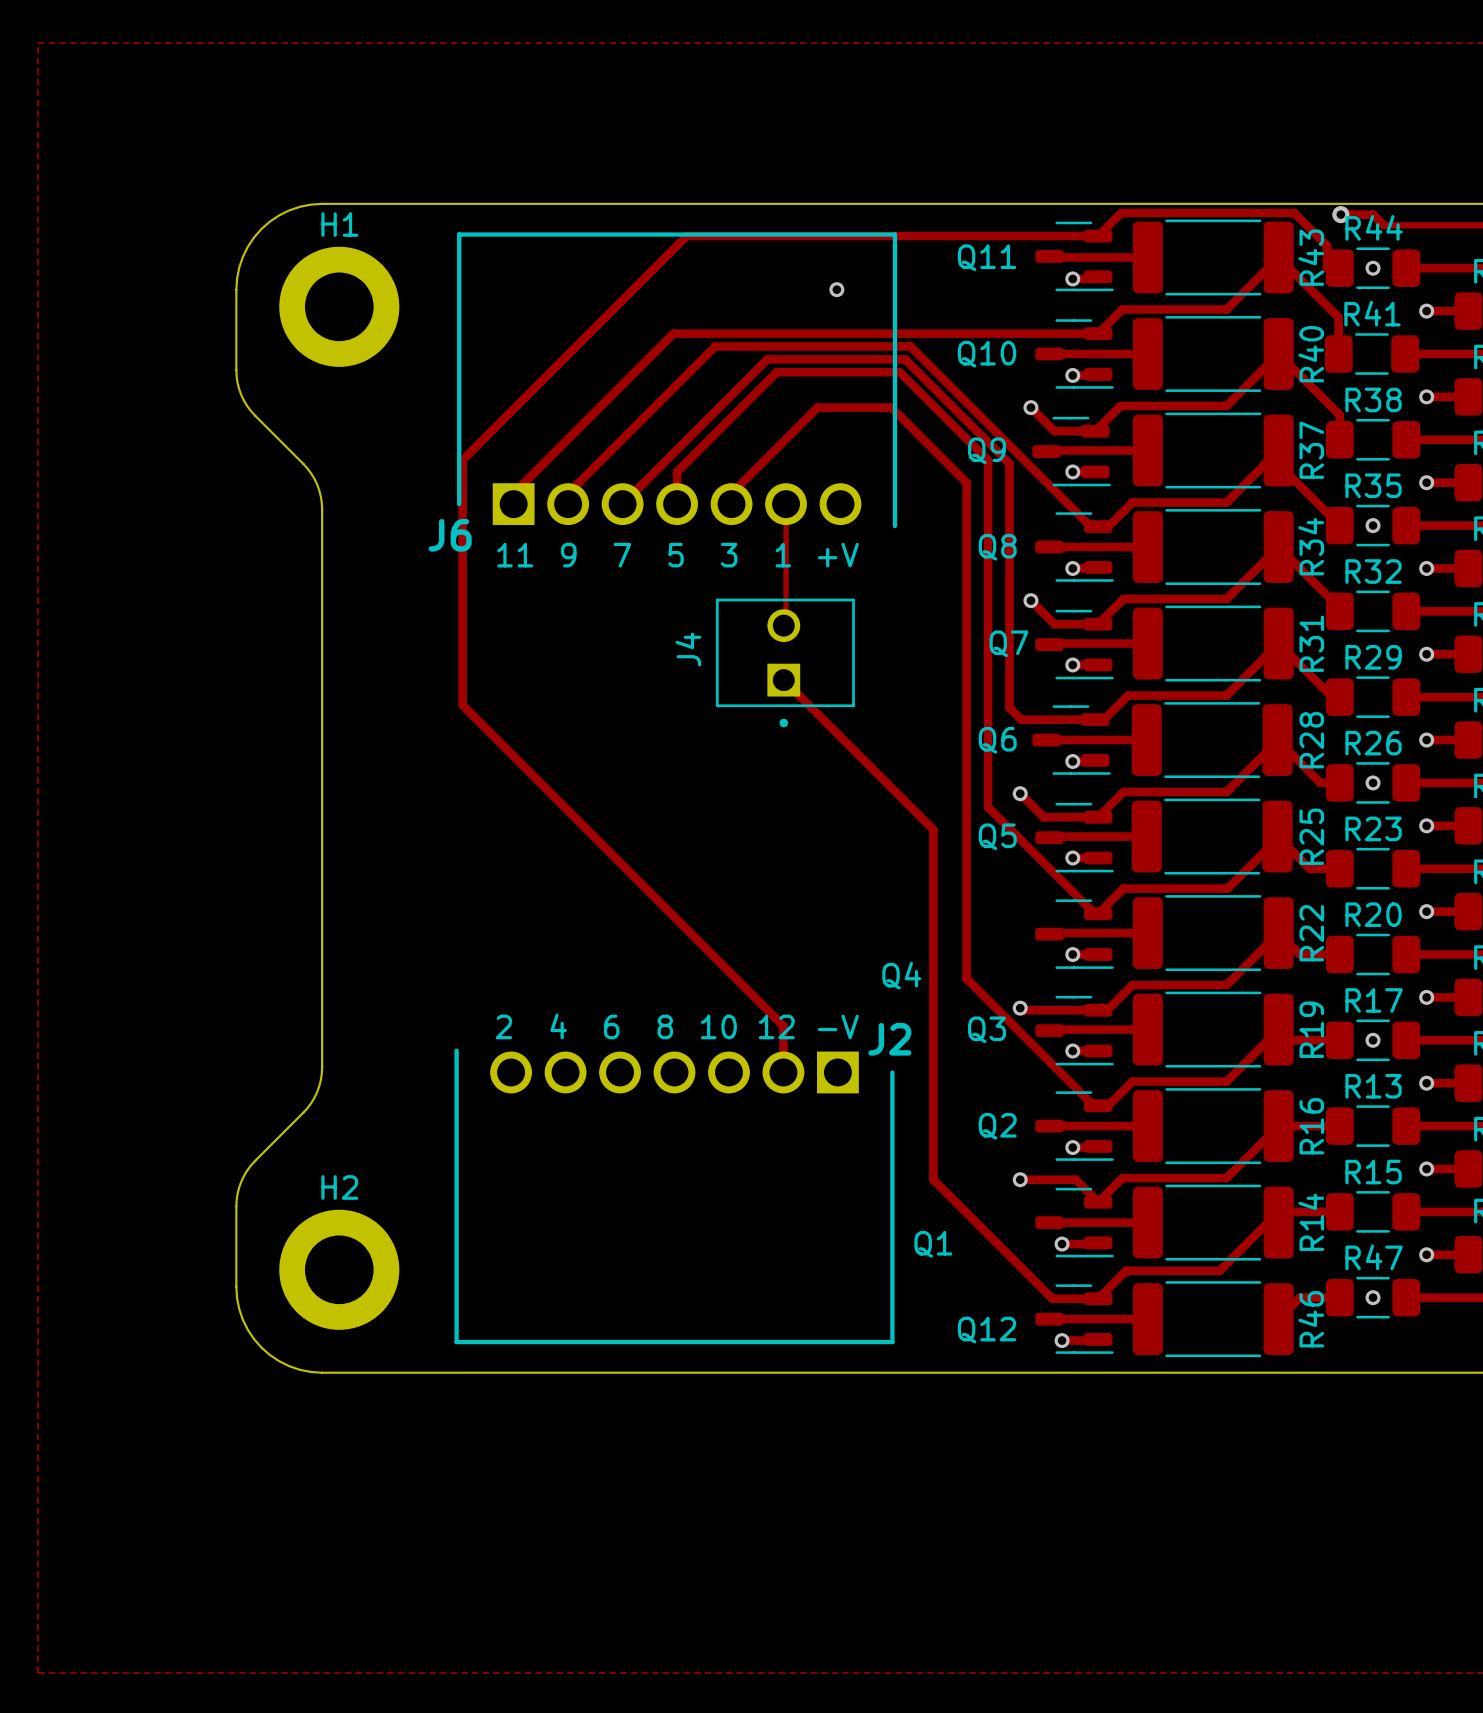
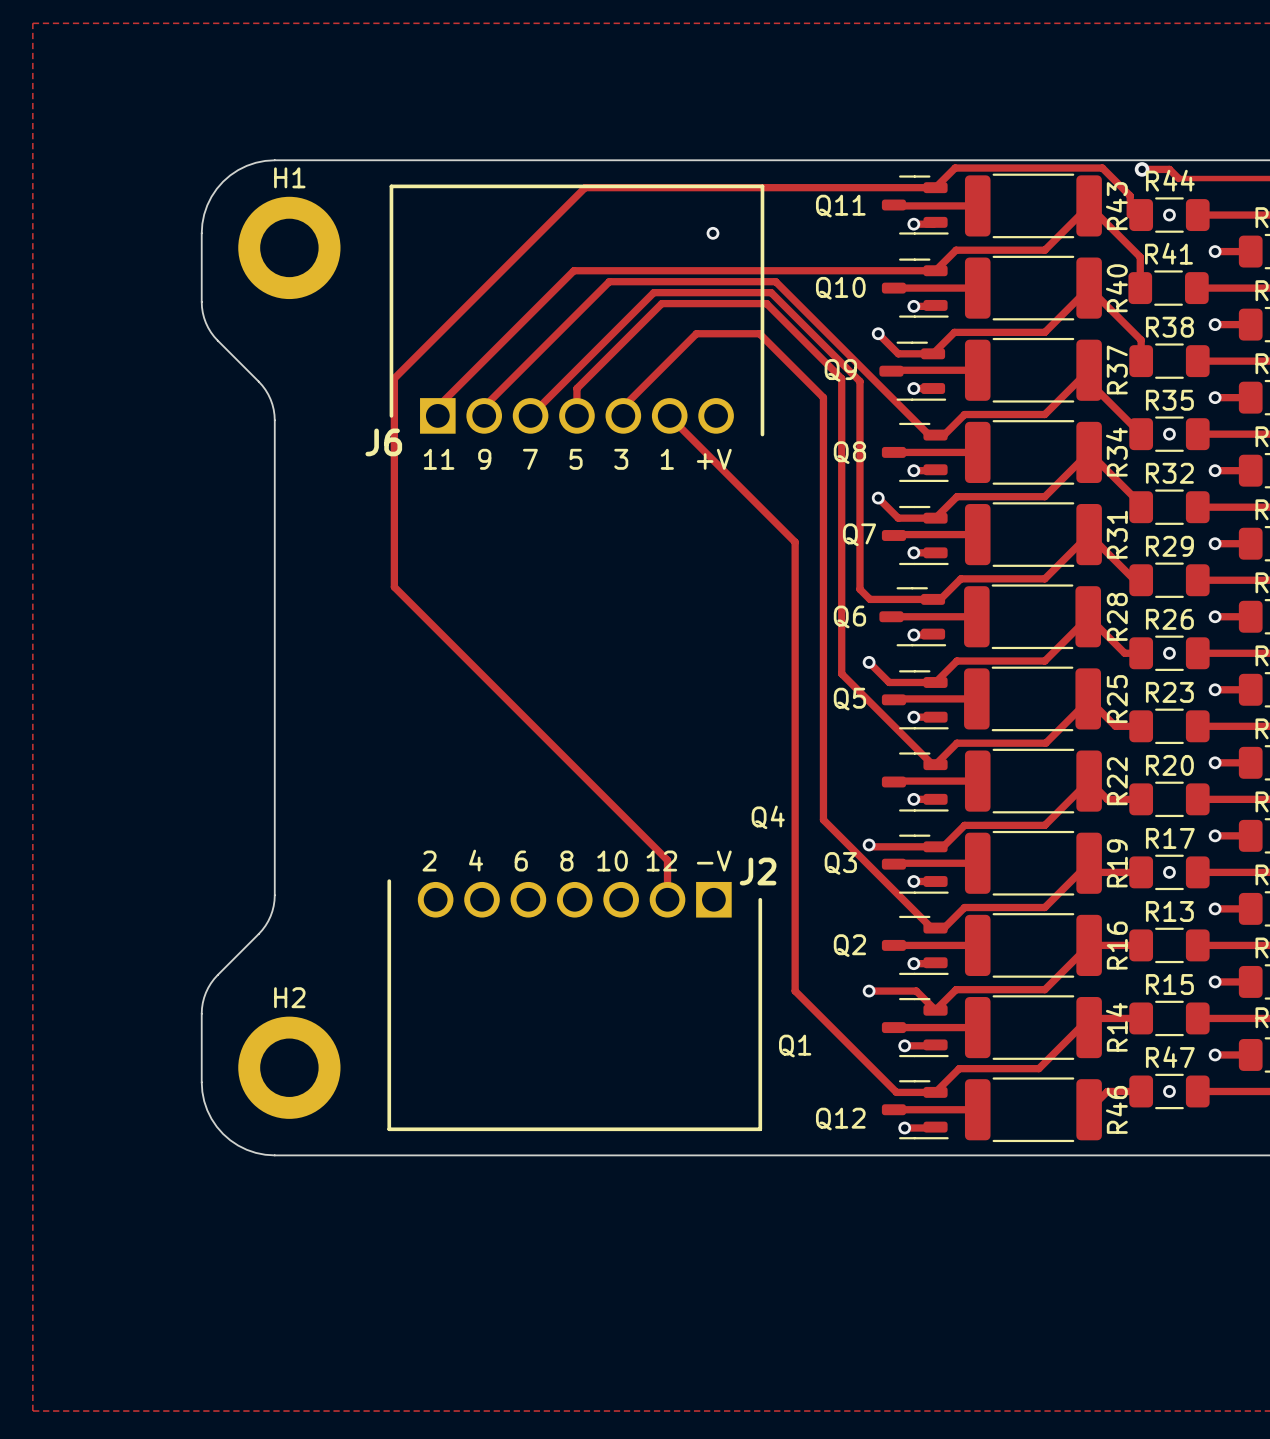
track: (786, 504) (786, 623) (783, 625) -> none
J4: (785, 662) -> none
track: (783, 680) (933, 829) -> (664, 411) (795, 542) (795, 693)

